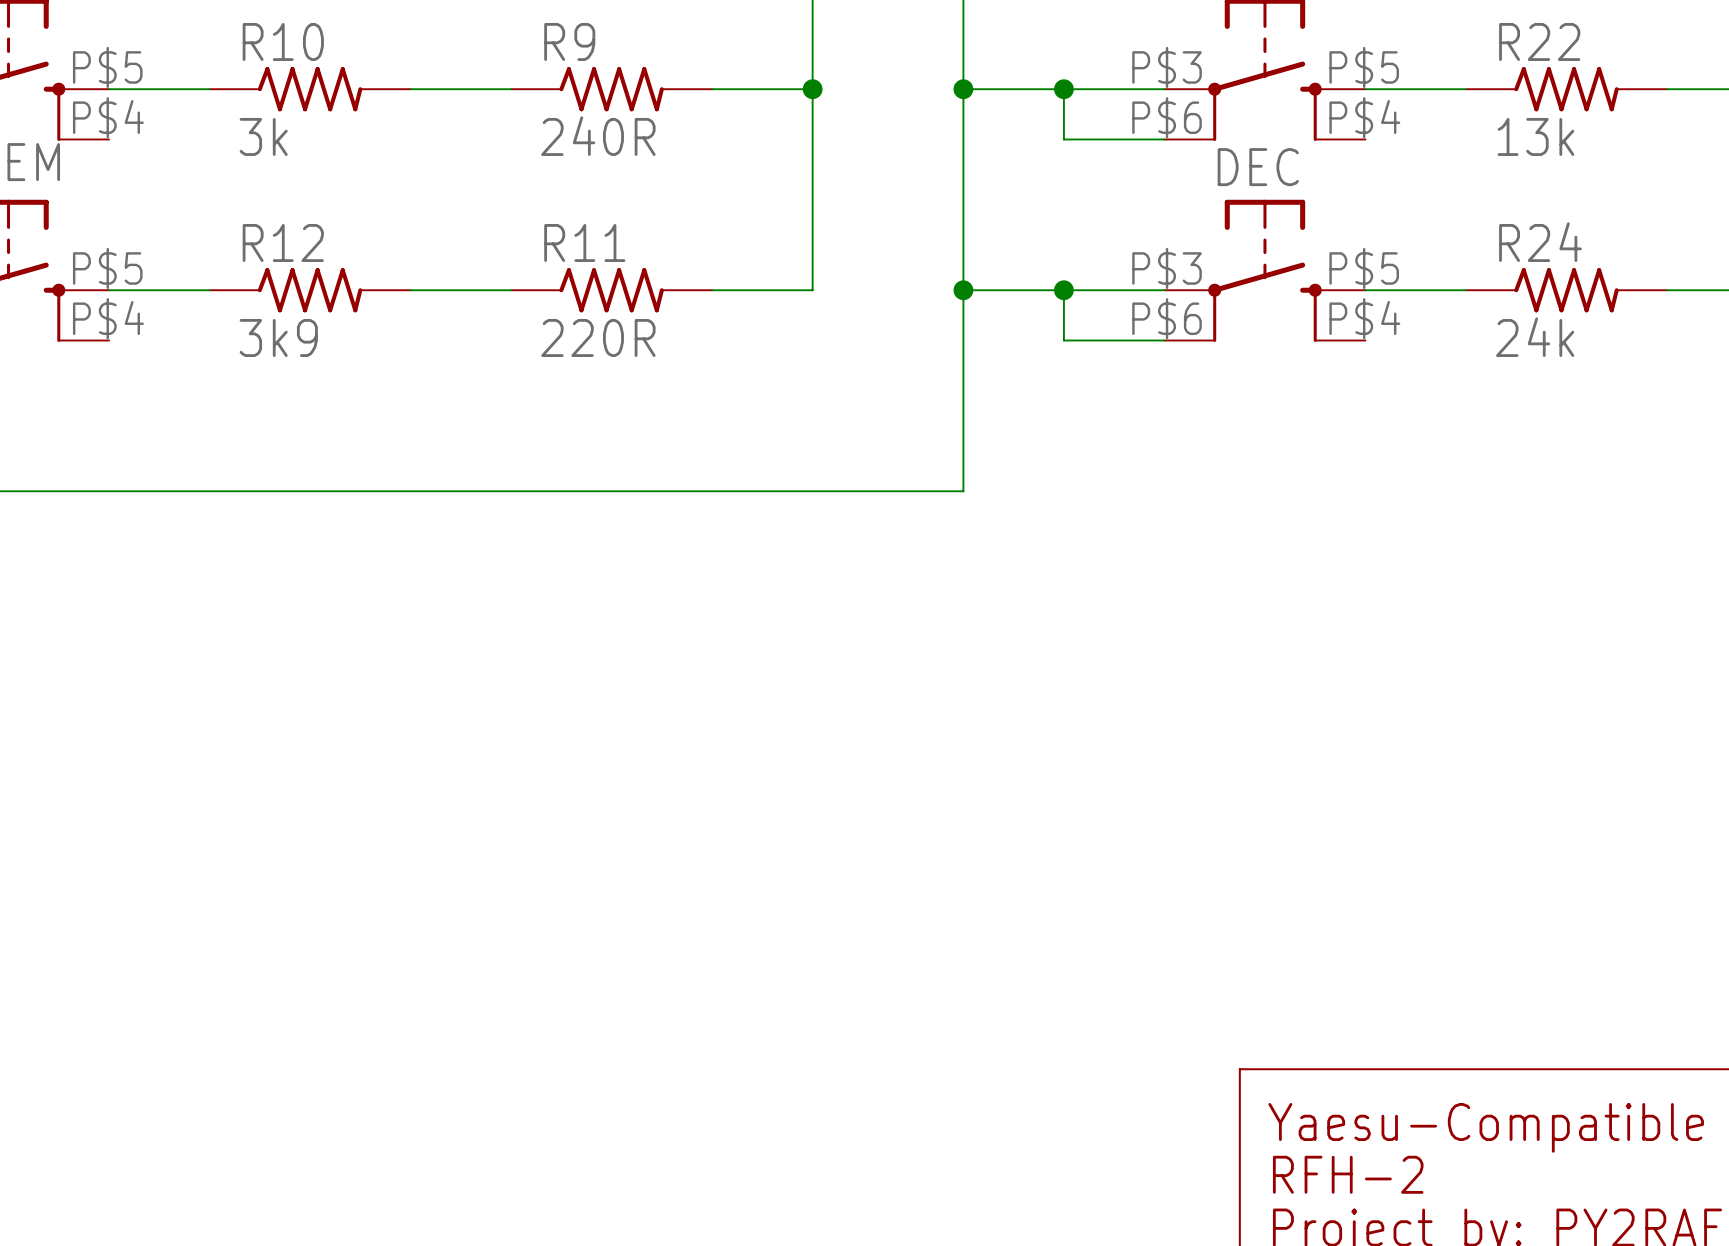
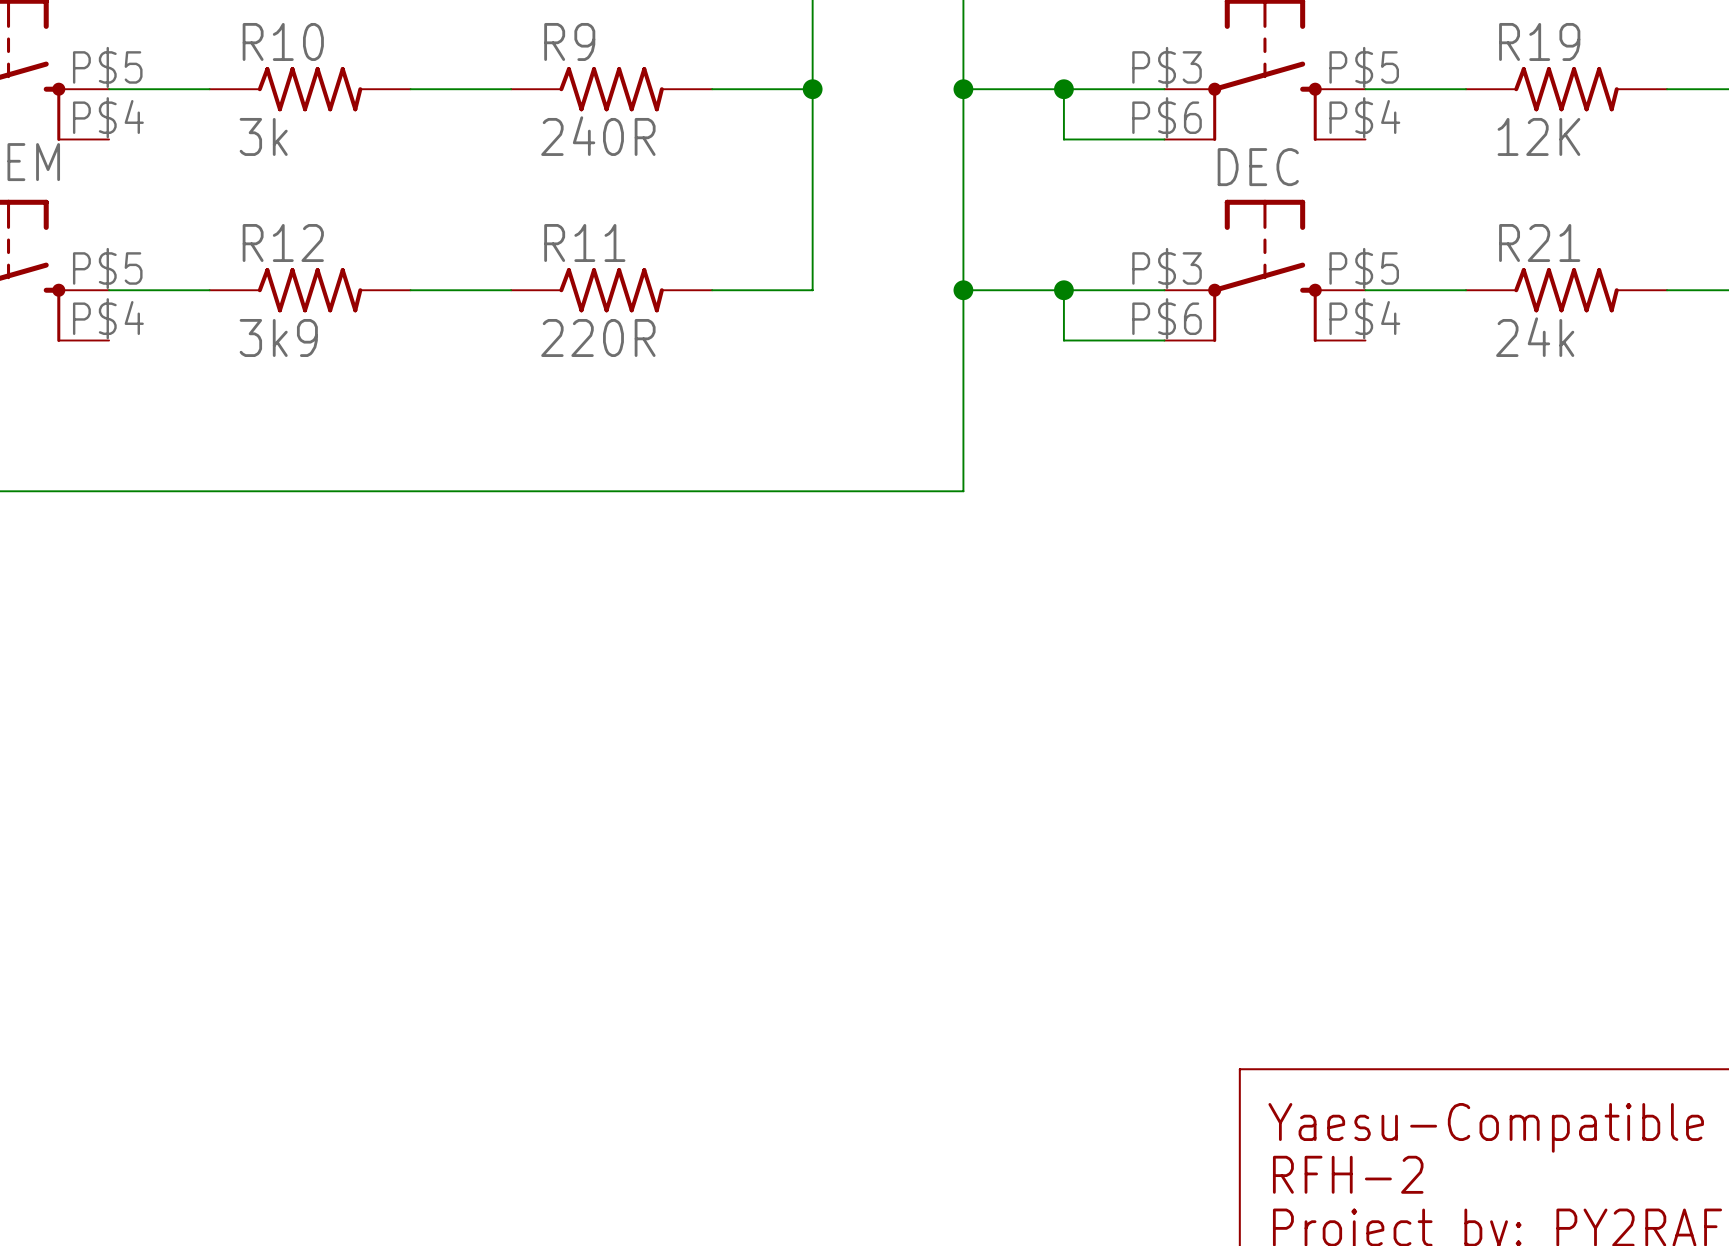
R22 name: R22 (1539, 41) -> R19 (1539, 41)
R22 value: 13k (1535, 136) -> 12K (1538, 136)
R24 name: R24 (1540, 242) -> R21 (1539, 243)

